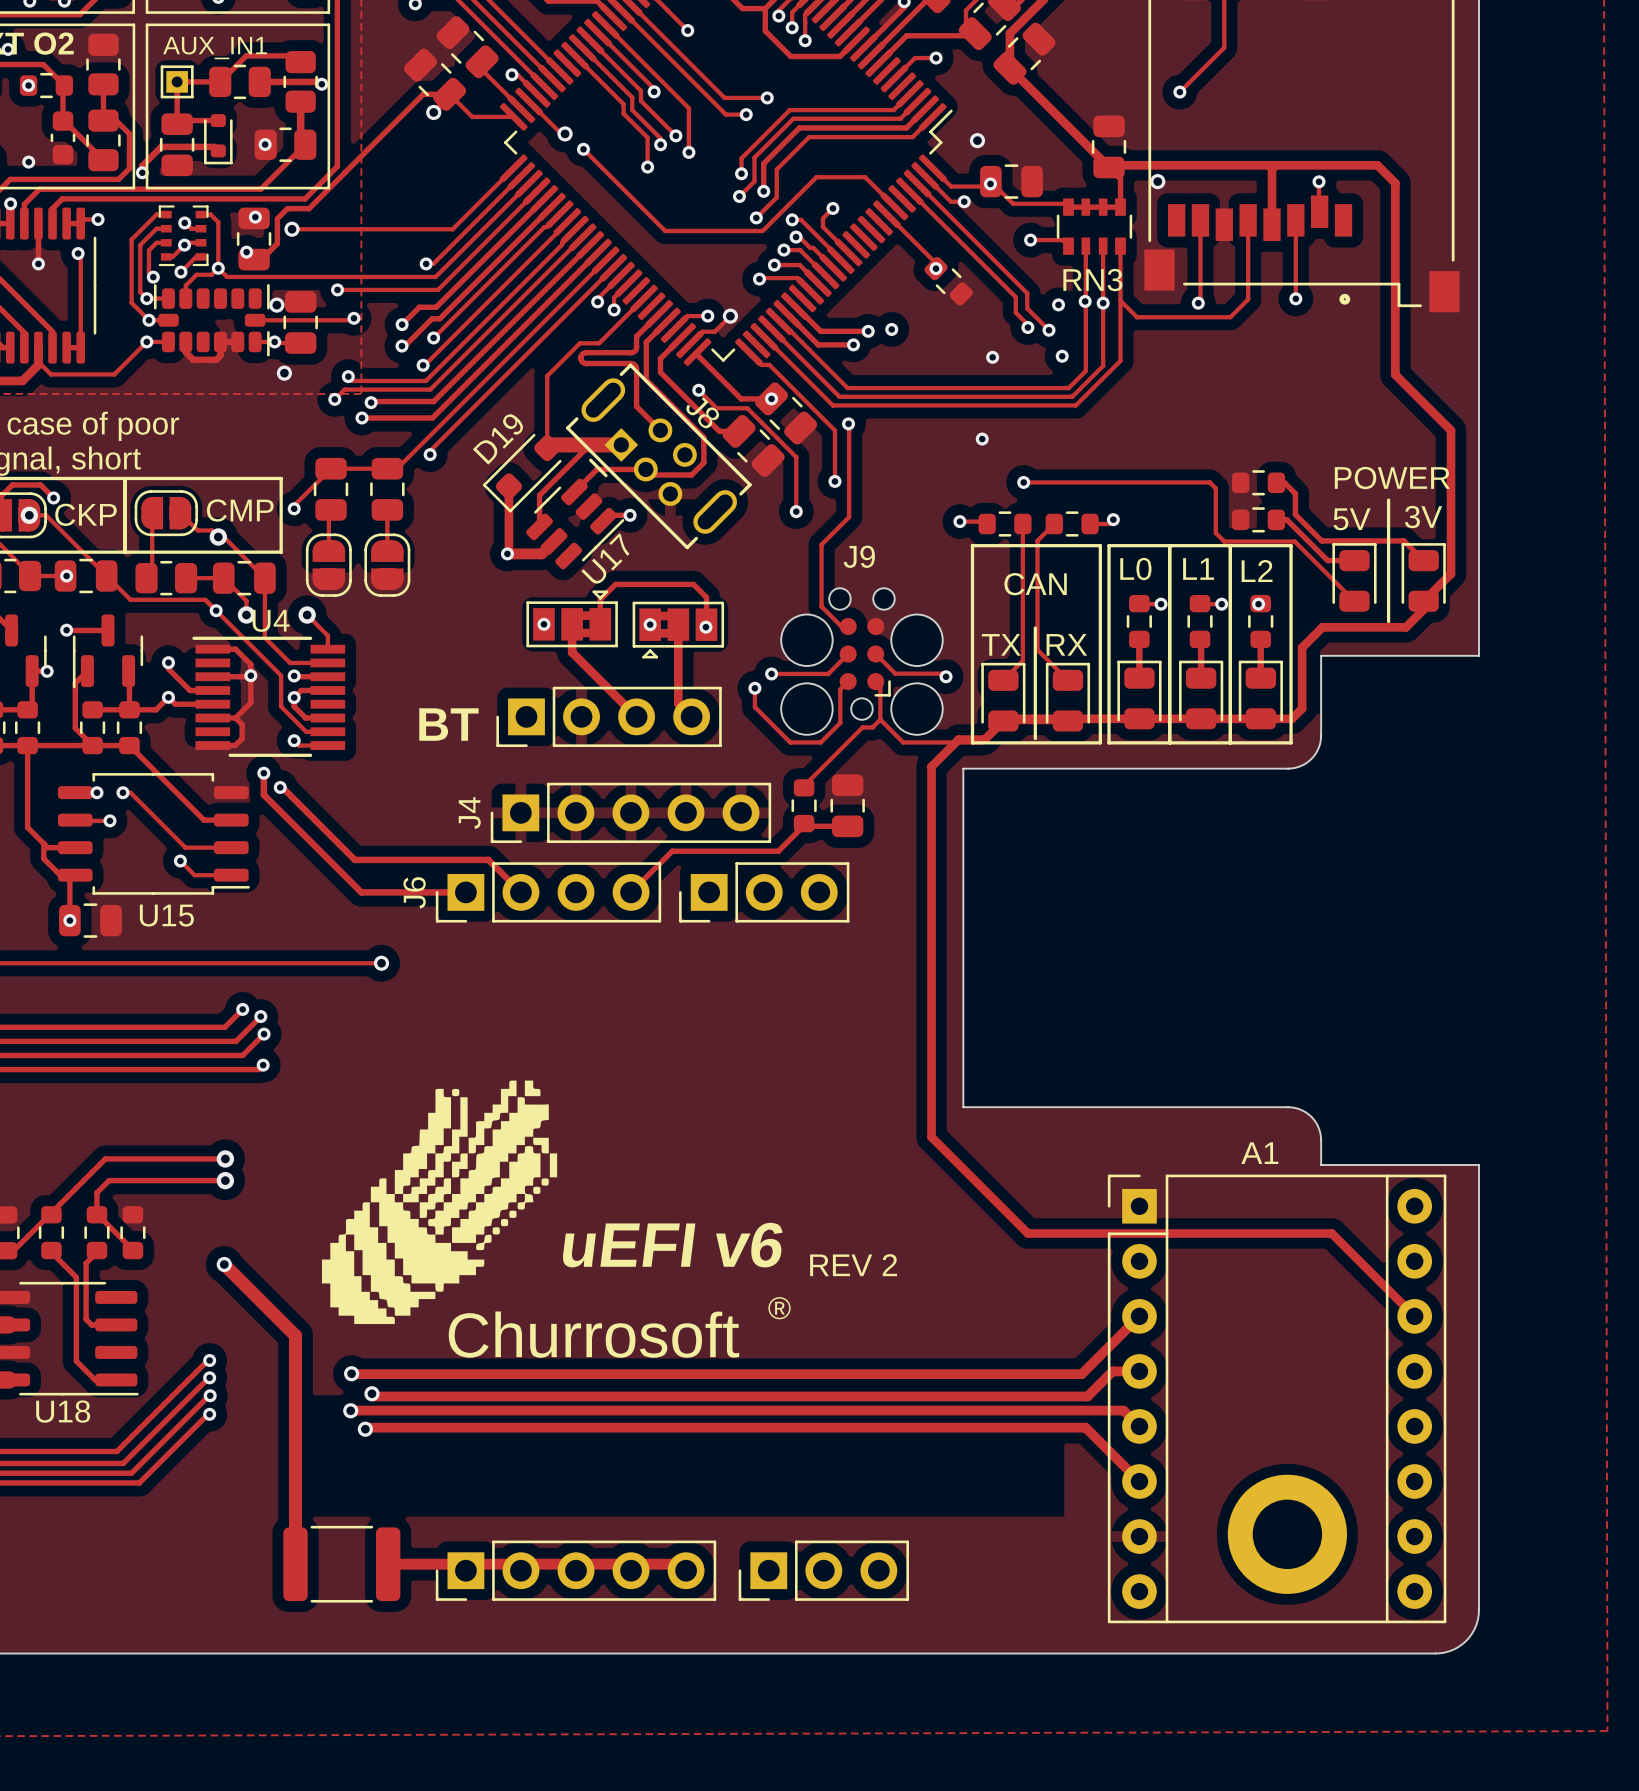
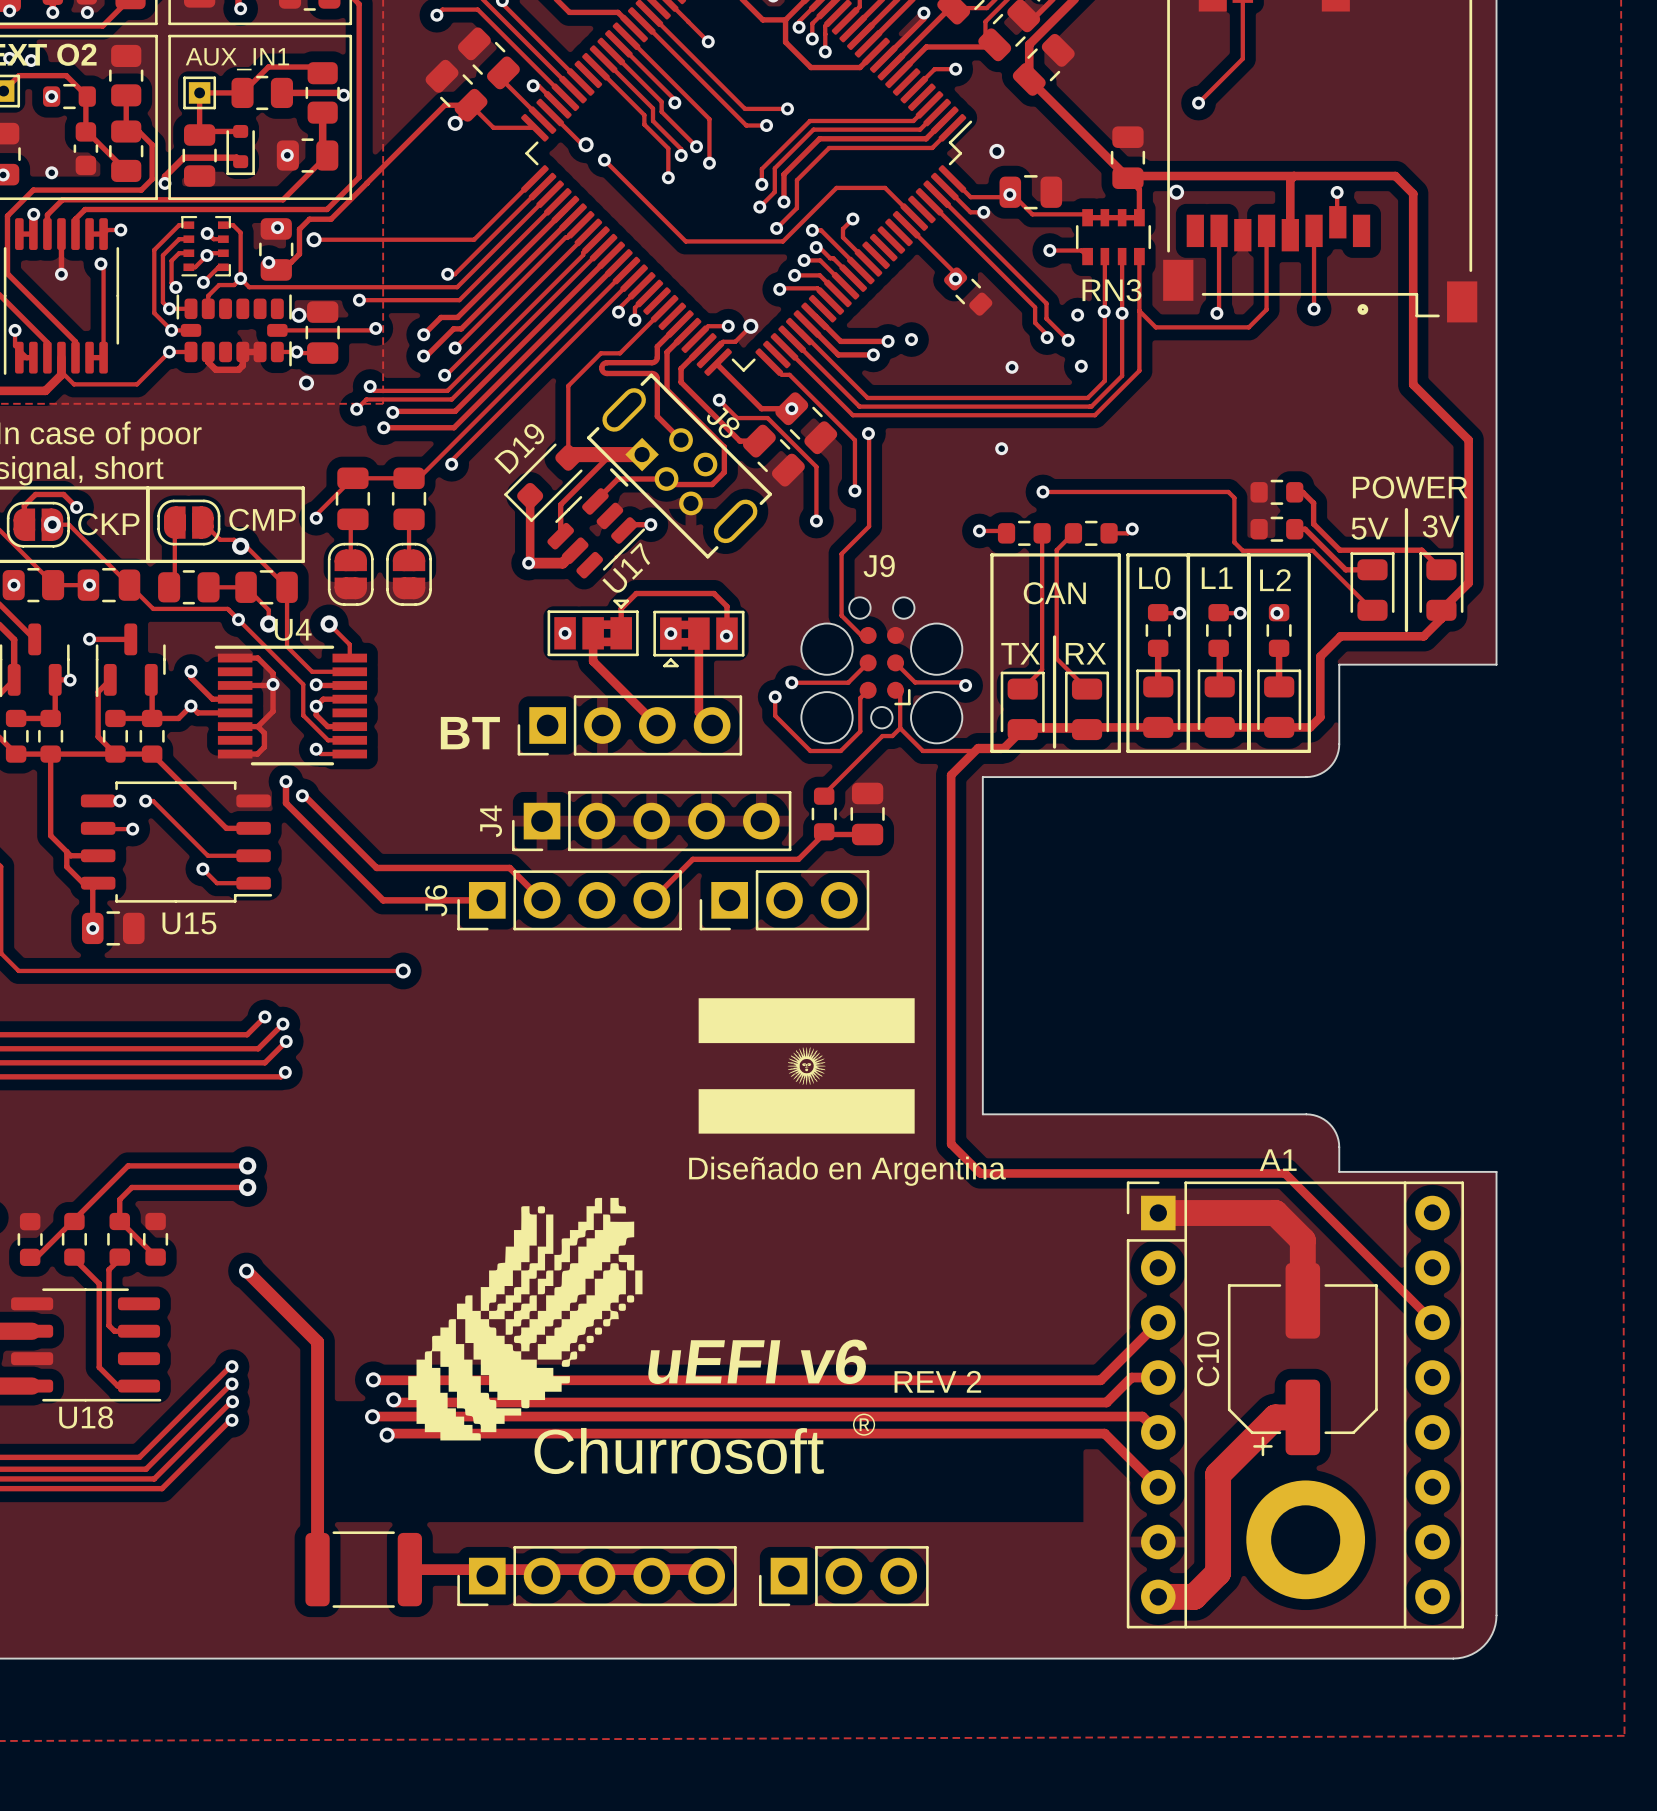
drawing: none -> [698, 998, 915, 1134]
text: none -> Diseñado en Argentina (847, 1171)
track: (961, 1166) (1027, 1233) (1331, 1233) (1414, 1316) -> (980, 1173) (1285, 1173) (1432, 1322)
Churrosoft position: (439, 1202) -> (525, 1319)
track: none -> (1158, 1213) (1275, 1213) (1302, 1240) (1302, 1300)
text position: uEFI v6 (672, 1245) -> uEFI v6 (757, 1361)
text position: REV 2 (853, 1265) -> REV 2 (937, 1381)
text position: ® (779, 1308) -> ® (864, 1424)
C10: none -> (1302, 1359)
track: none -> (1302, 1417) (1275, 1417) (1218, 1474) (1218, 1572) (1194, 1596) (1158, 1596)

